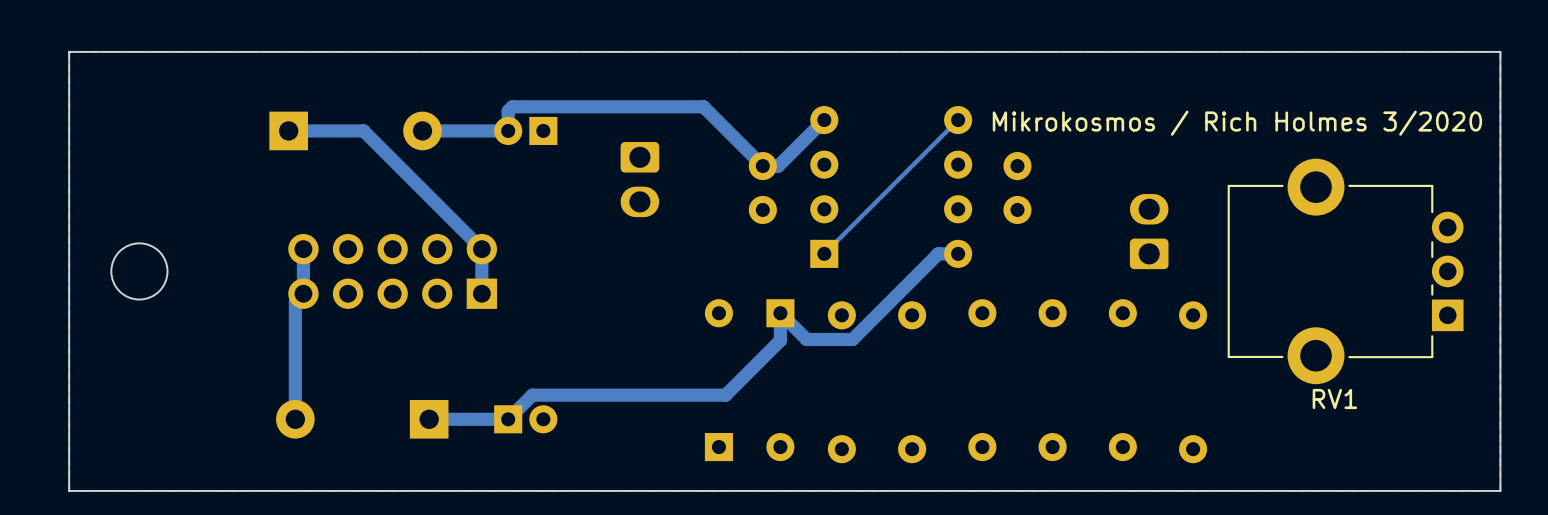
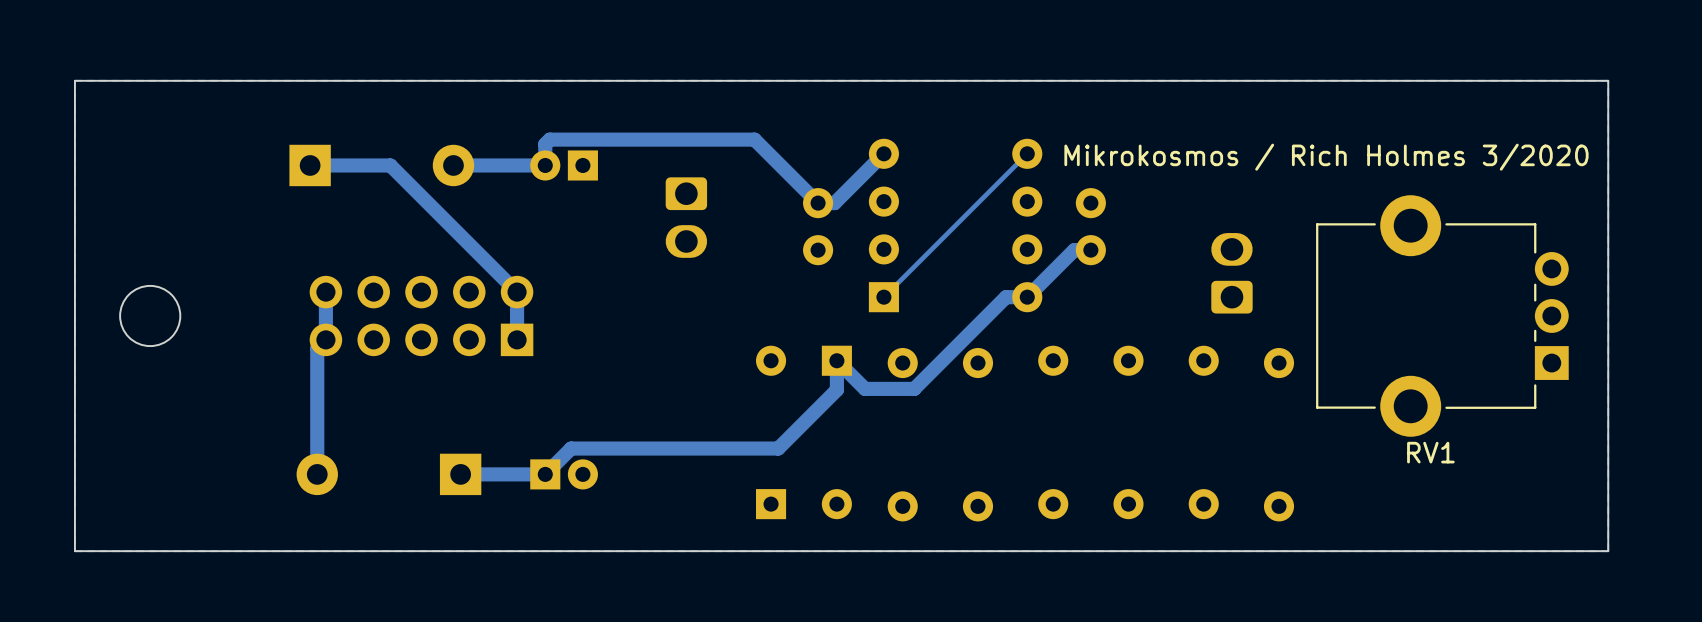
track: none -> (1090, 250) (1074, 250) (1027, 297)

